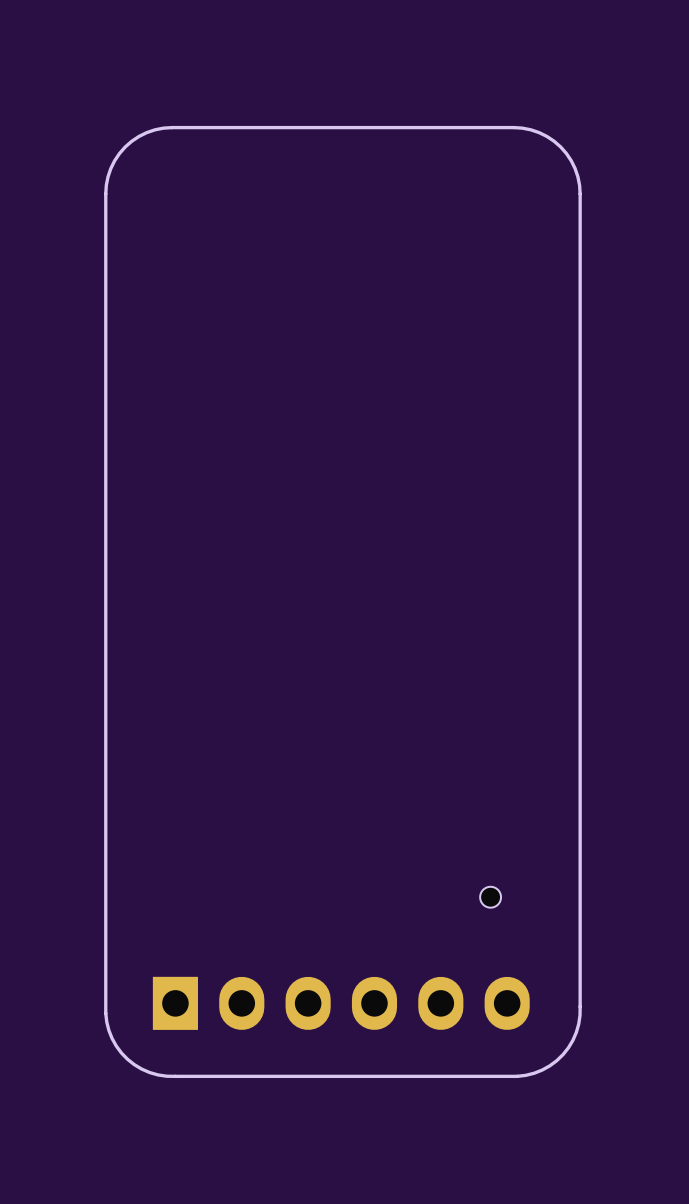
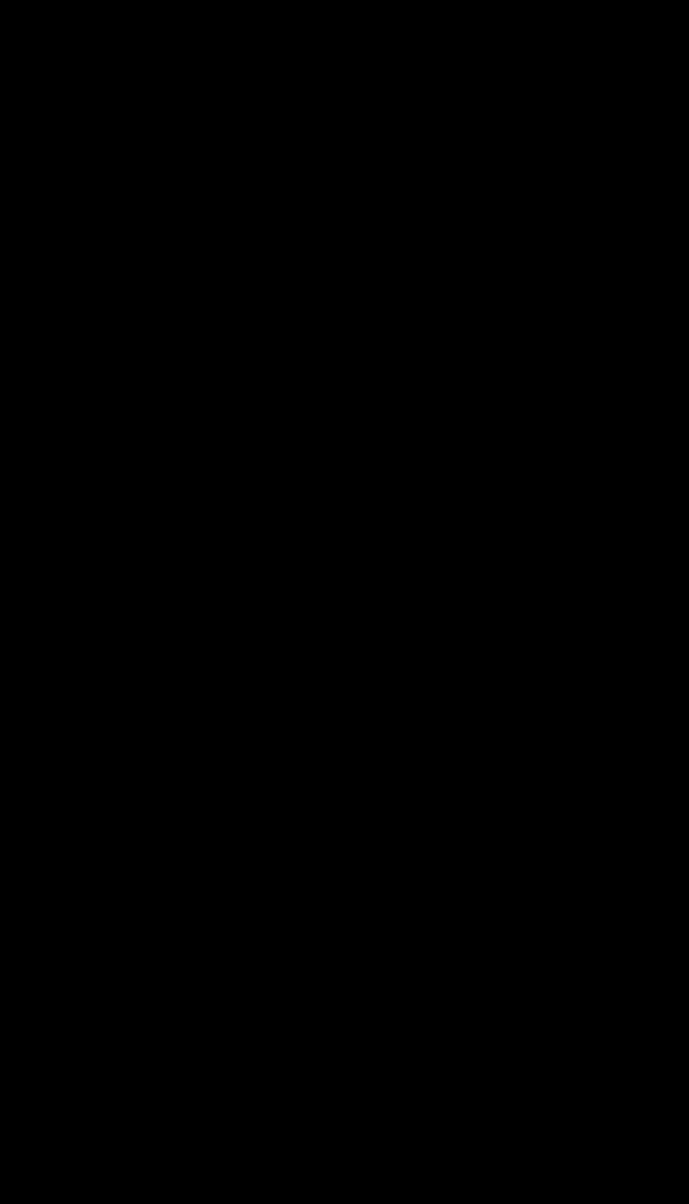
board edge: (513, 127) (163, 128) (146, 132) (131, 141) (119, 153) (110, 168) (105, 193) (105, 1013) (108, 1030) (116, 1046) (134, 1064) (149, 1072) (175, 1076) (517, 1076) (534, 1073) (549, 1065) (563, 1054) (576, 1032) (580, 1006) (579, 185) (571, 160) (560, 147) (539, 132) (513, 127) -> none
part: (490, 897) -> none
part: (341, 1003) -> none

